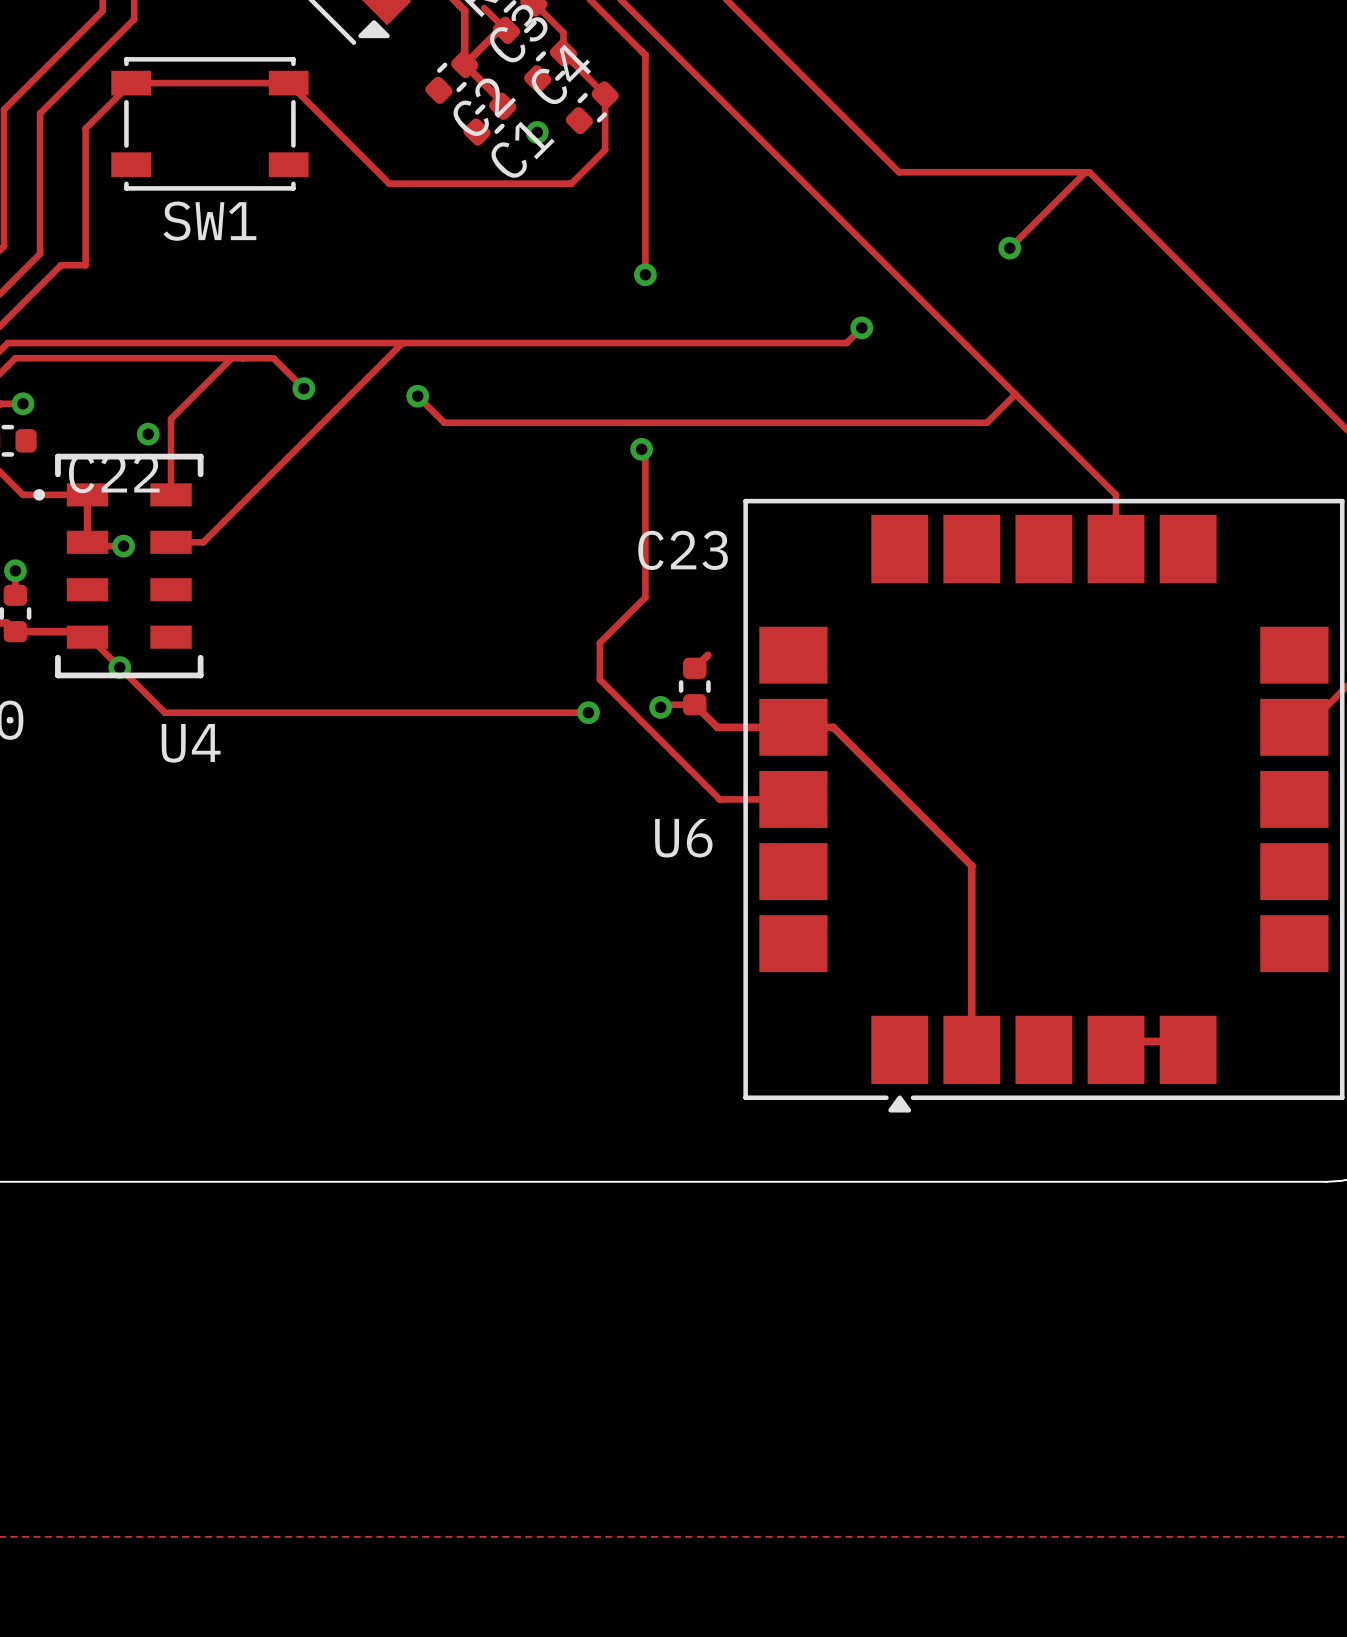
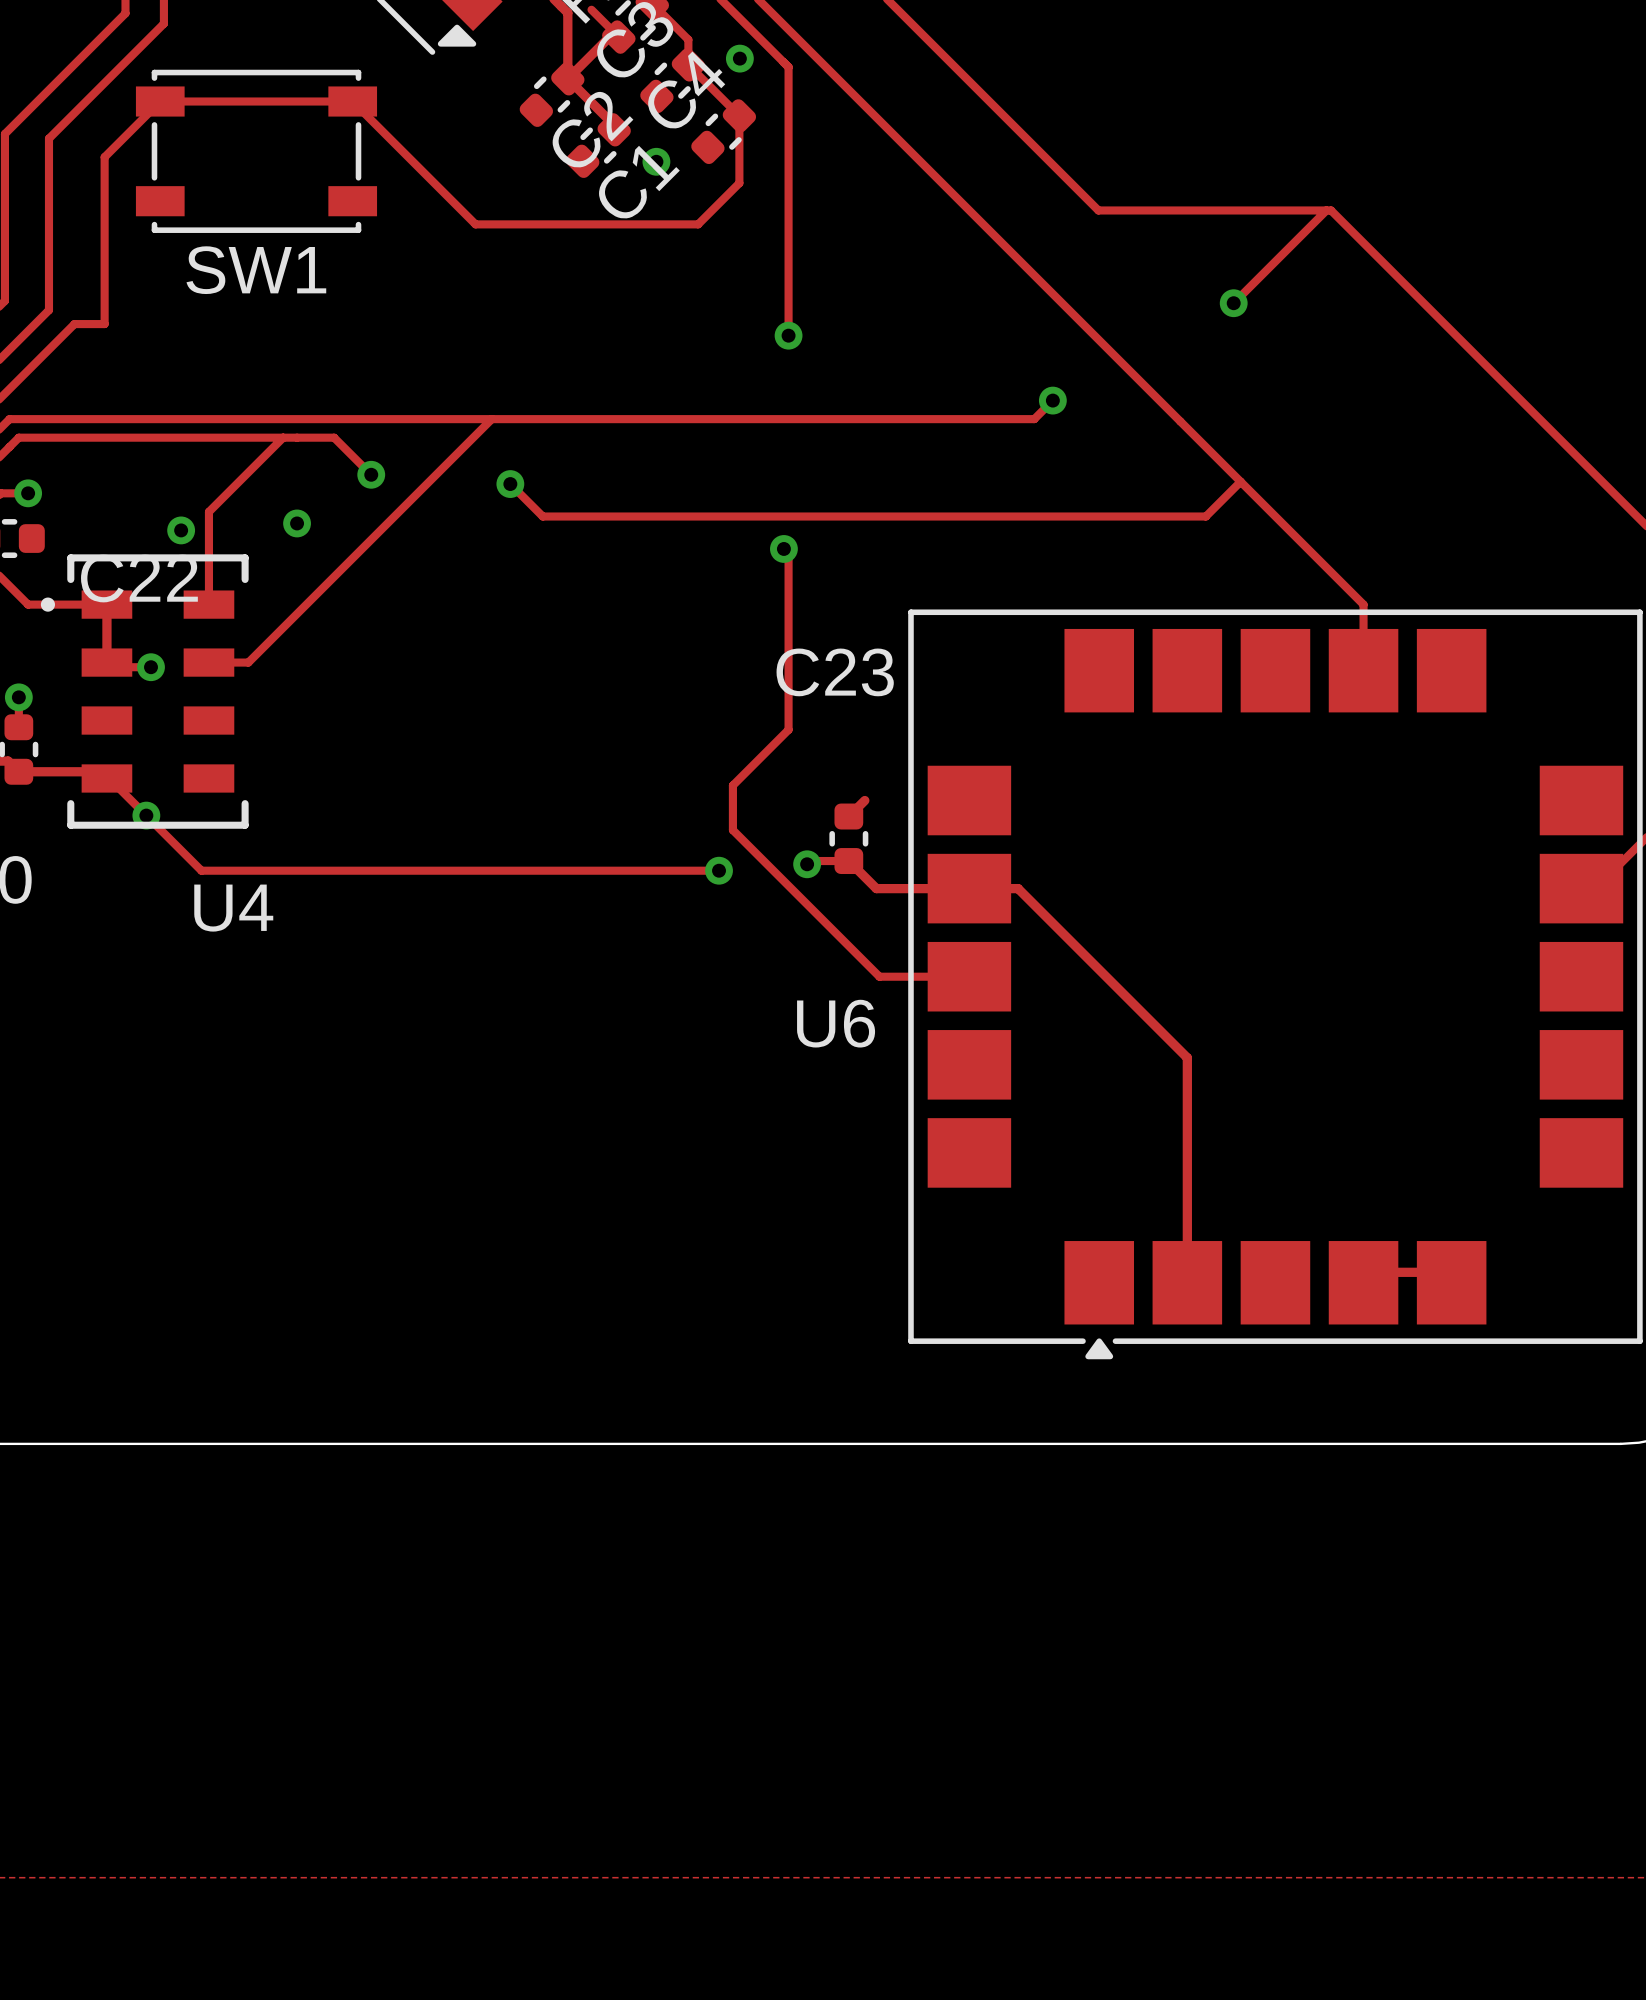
via: none -> (739, 58)
via: none -> (297, 523)

